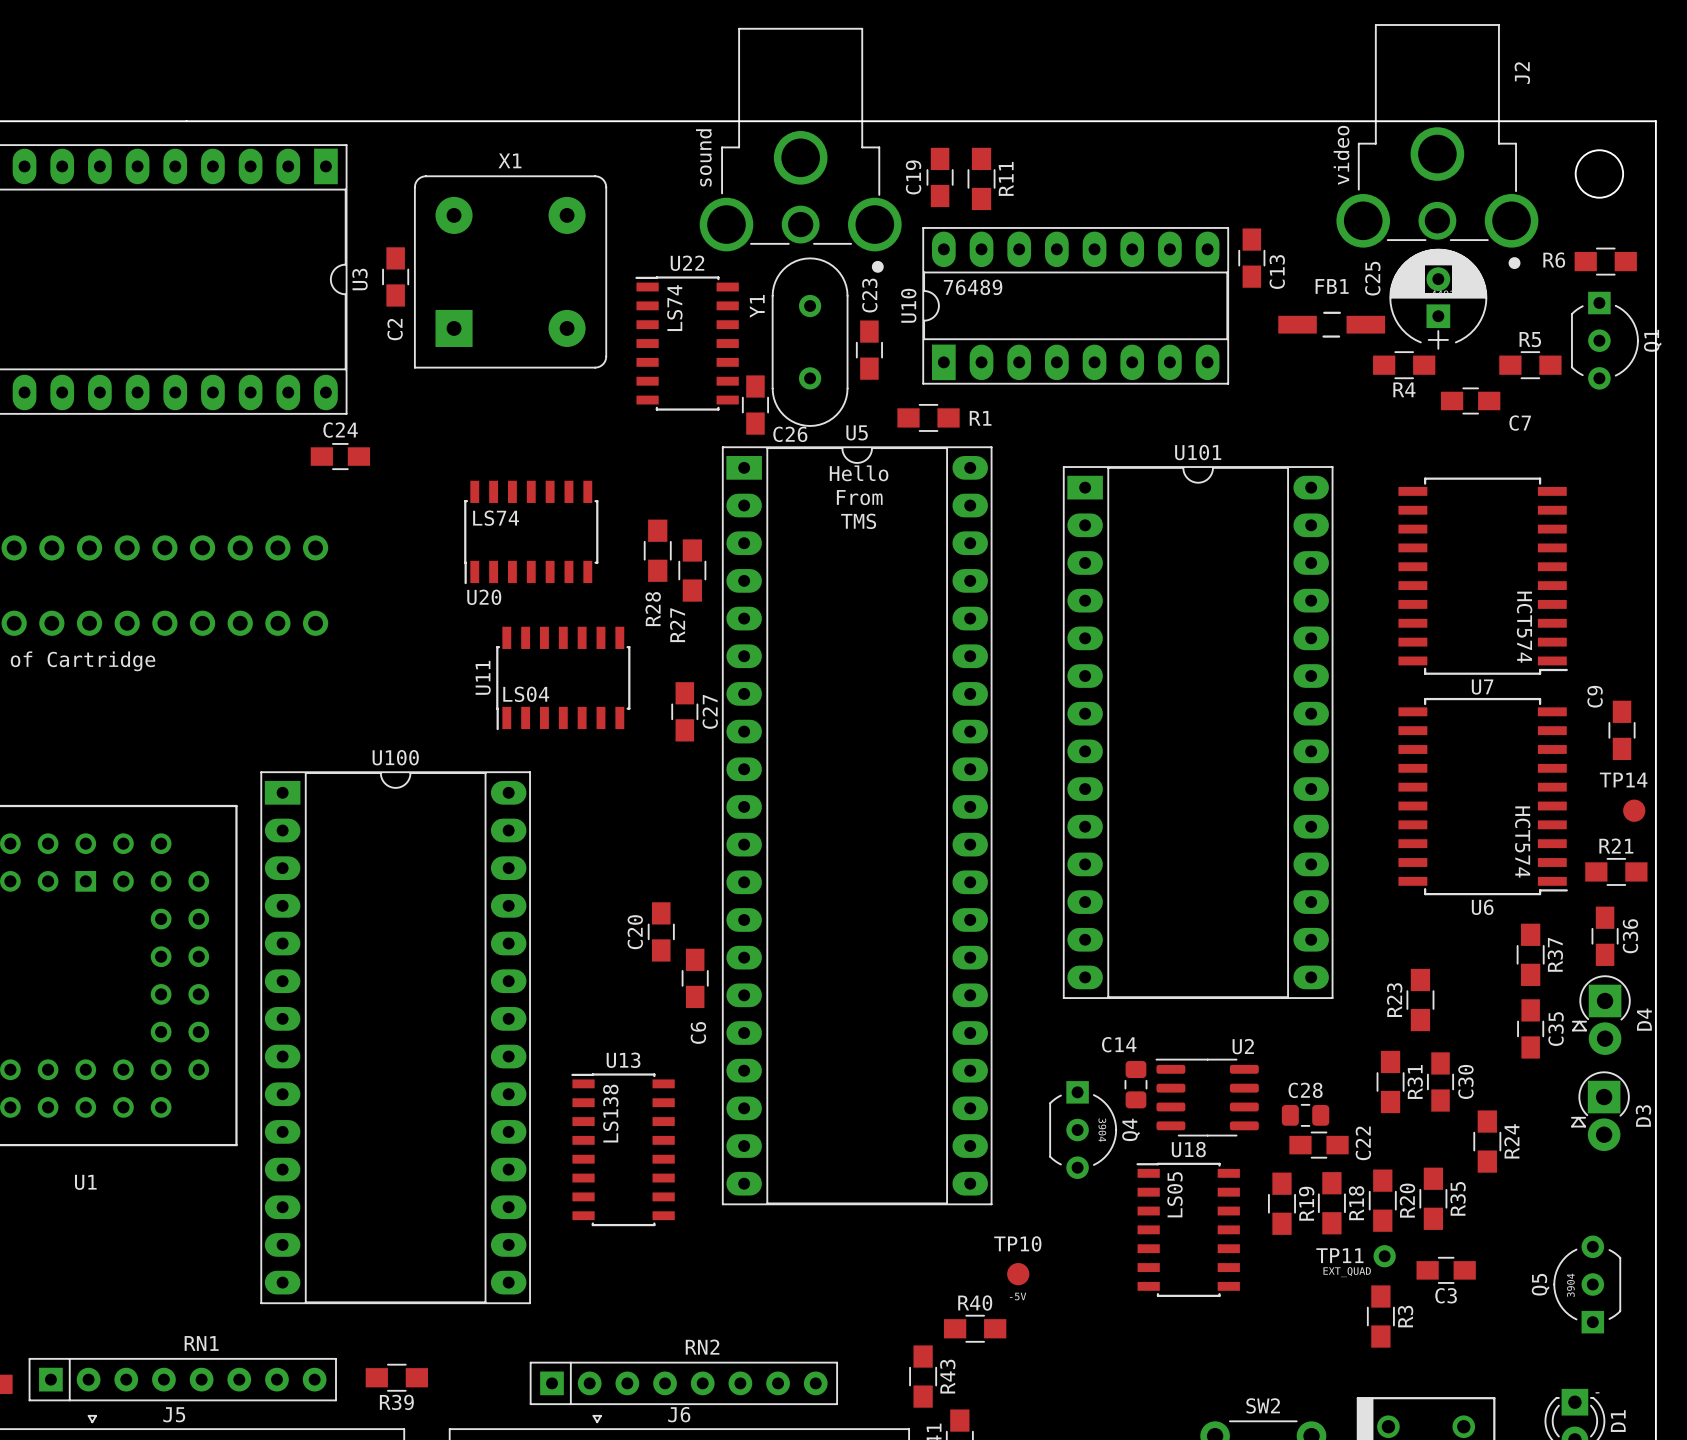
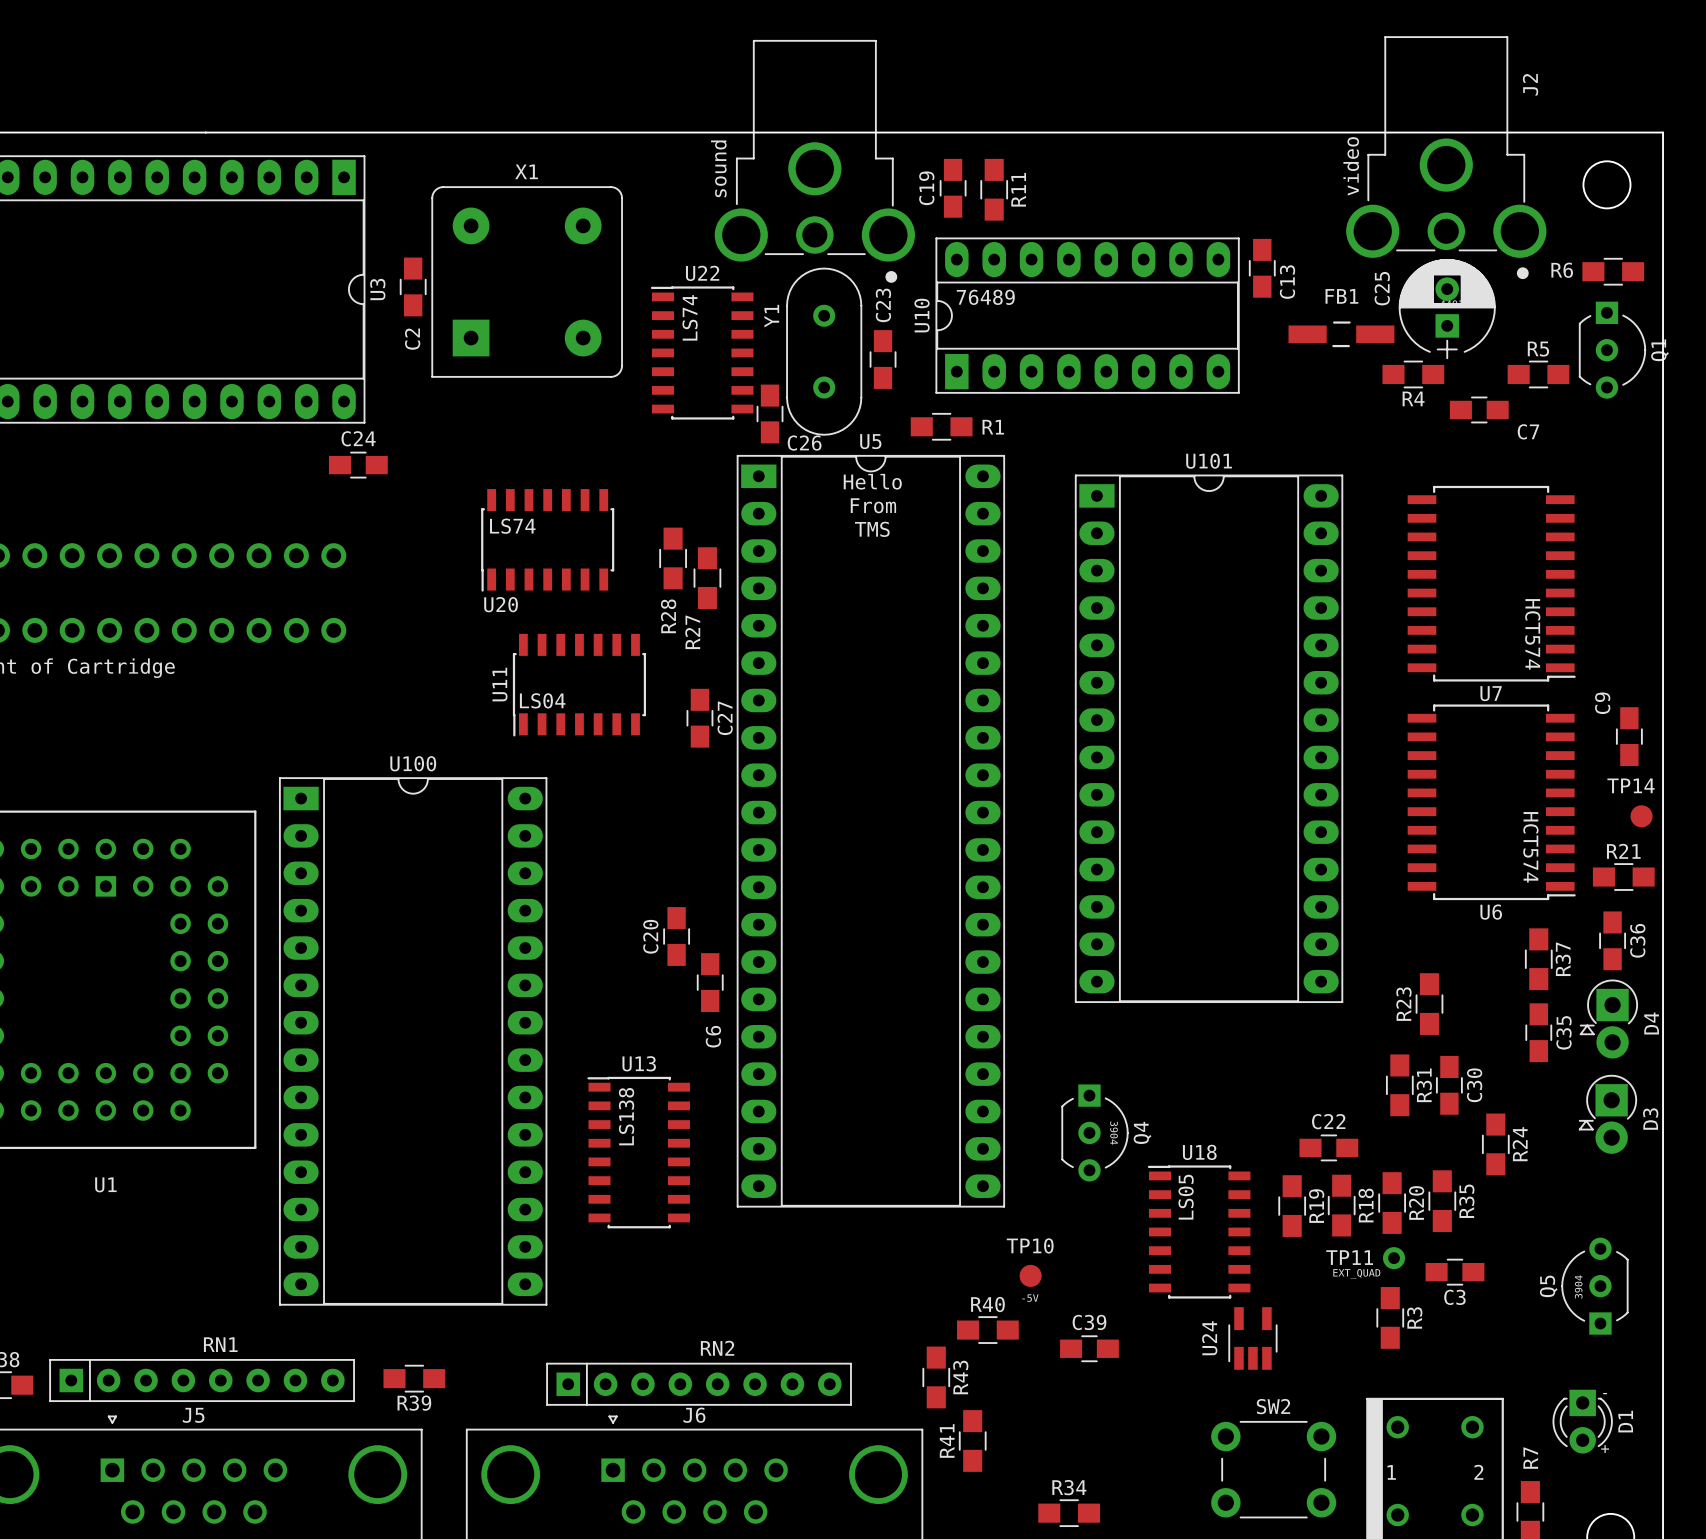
C14: (1135, 1084) -> none
U2: (1207, 1097) -> none
C28: (1305, 1115) -> none
C22 name rotation: 0° (1363, 1143) -> 90° clockwise (1328, 1121)
U24: none -> (1252, 1338)
C39: none -> (1089, 1348)

